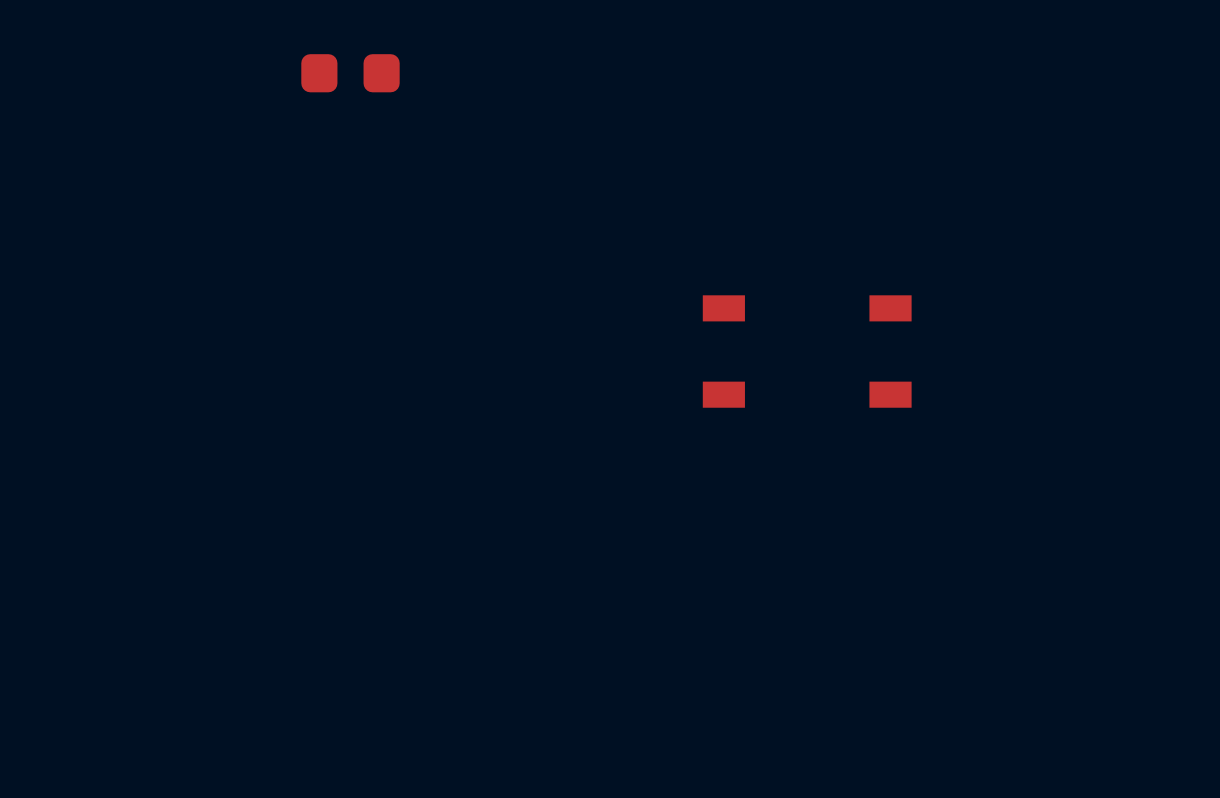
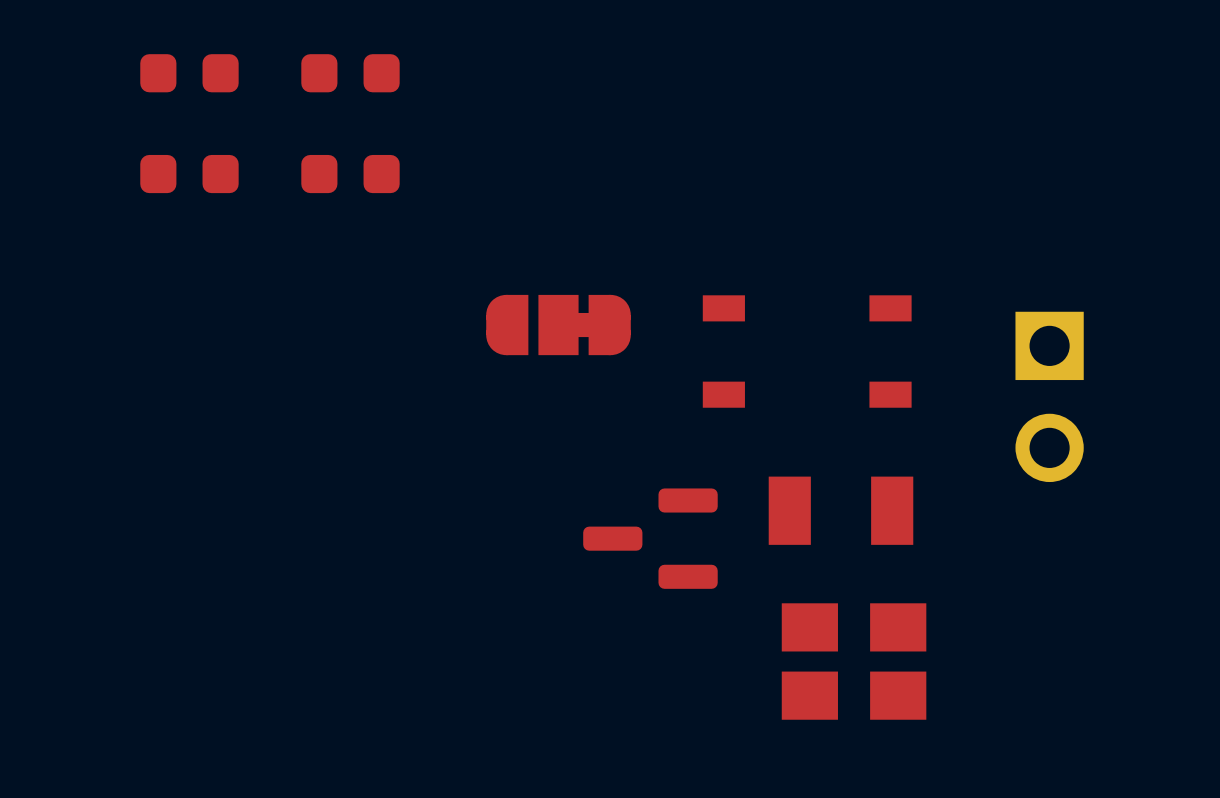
part: none -> (189, 73)
part: none -> (189, 174)
part: none -> (350, 174)
part: none -> (558, 325)
part: none -> (1049, 396)
part: none -> (840, 510)
part: none -> (650, 538)
part: none -> (854, 661)

